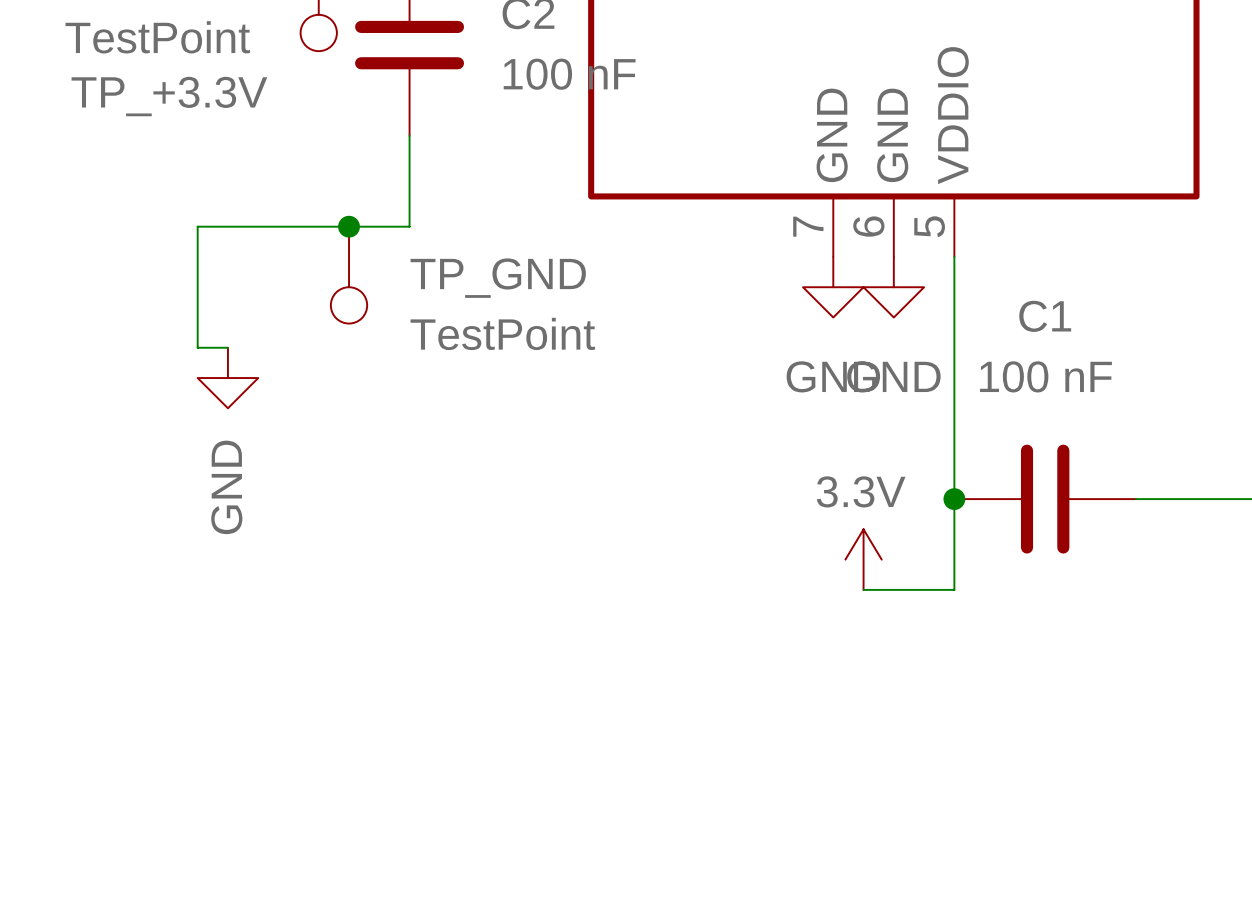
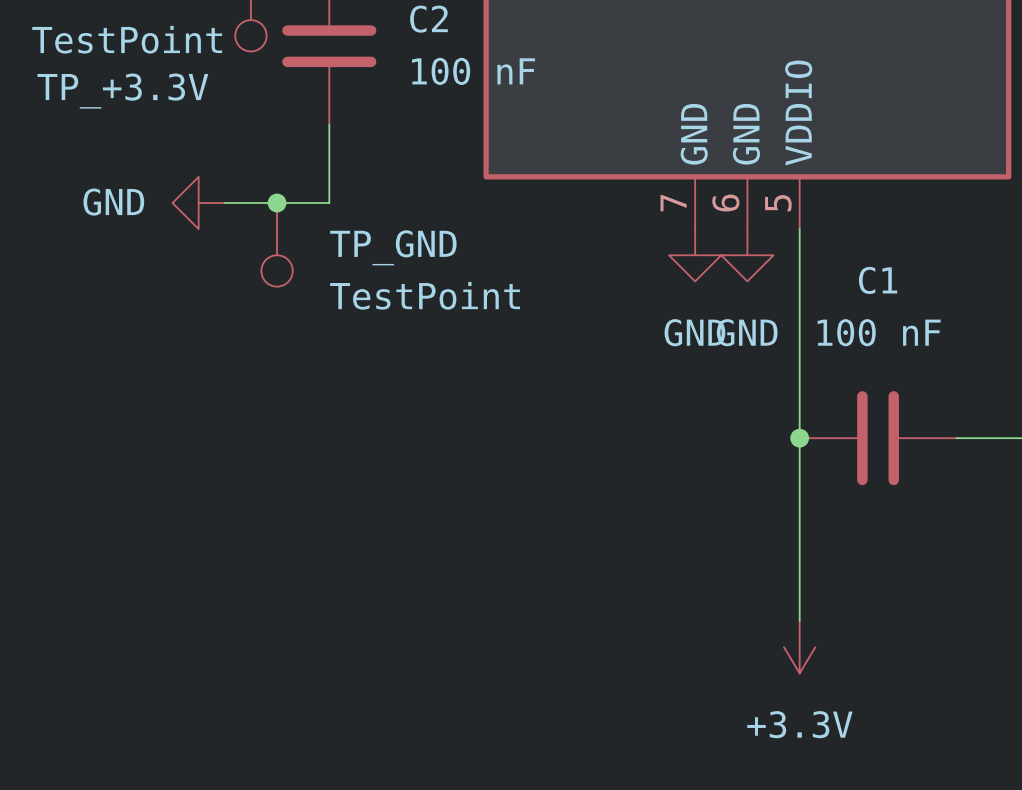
wire: (288, 226) (197, 226) (197, 347) (227, 347) -> none
power symbol rotation: 0° (227, 378) -> 90° clockwise (198, 203)
power symbol position: GND (227, 378) -> GND (198, 203)
power symbol: 3.3V (863, 559) -> none
wire: (863, 589) (954, 589) -> (799, 621) (799, 516)
power symbol: none -> +3.3V (799, 647)

